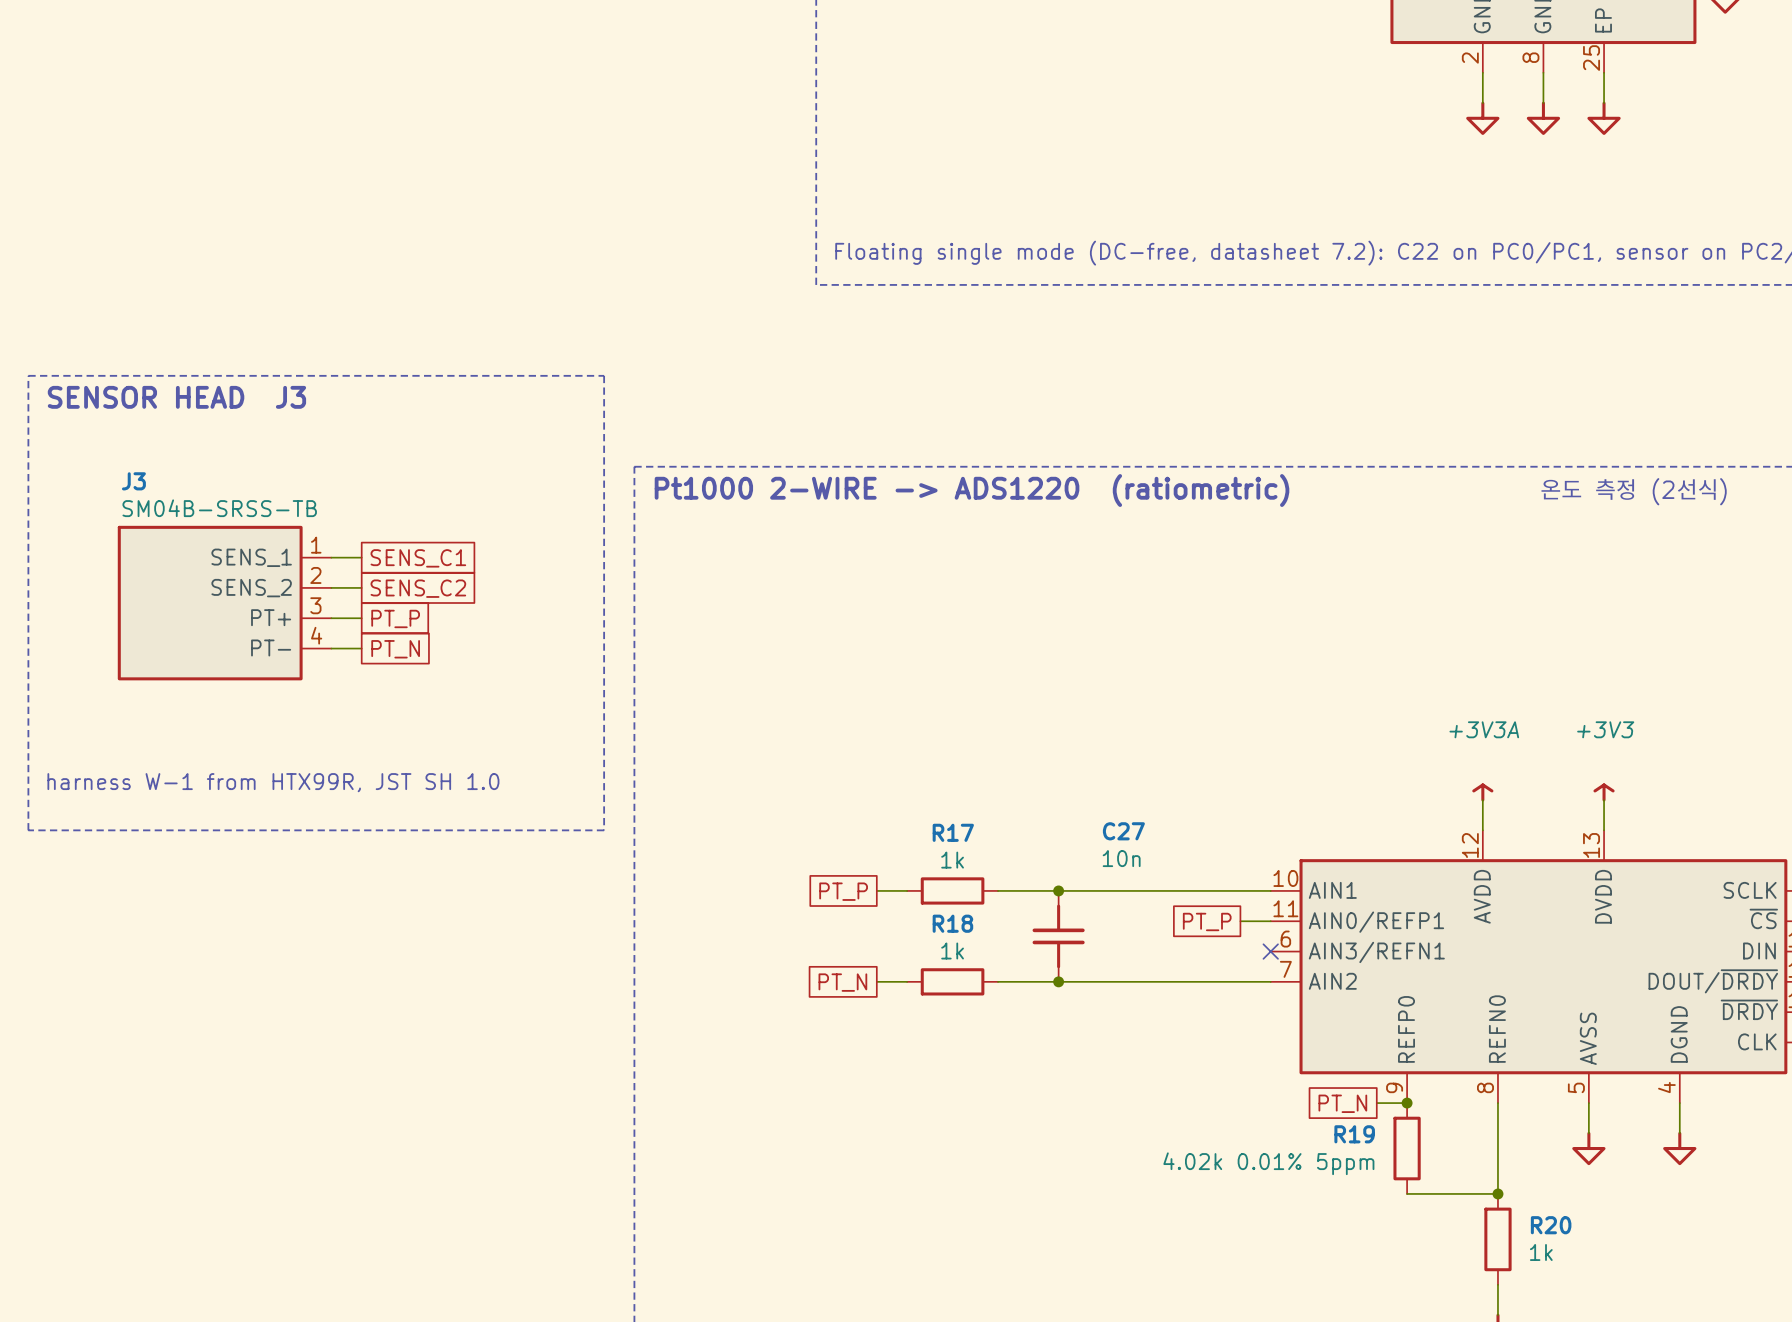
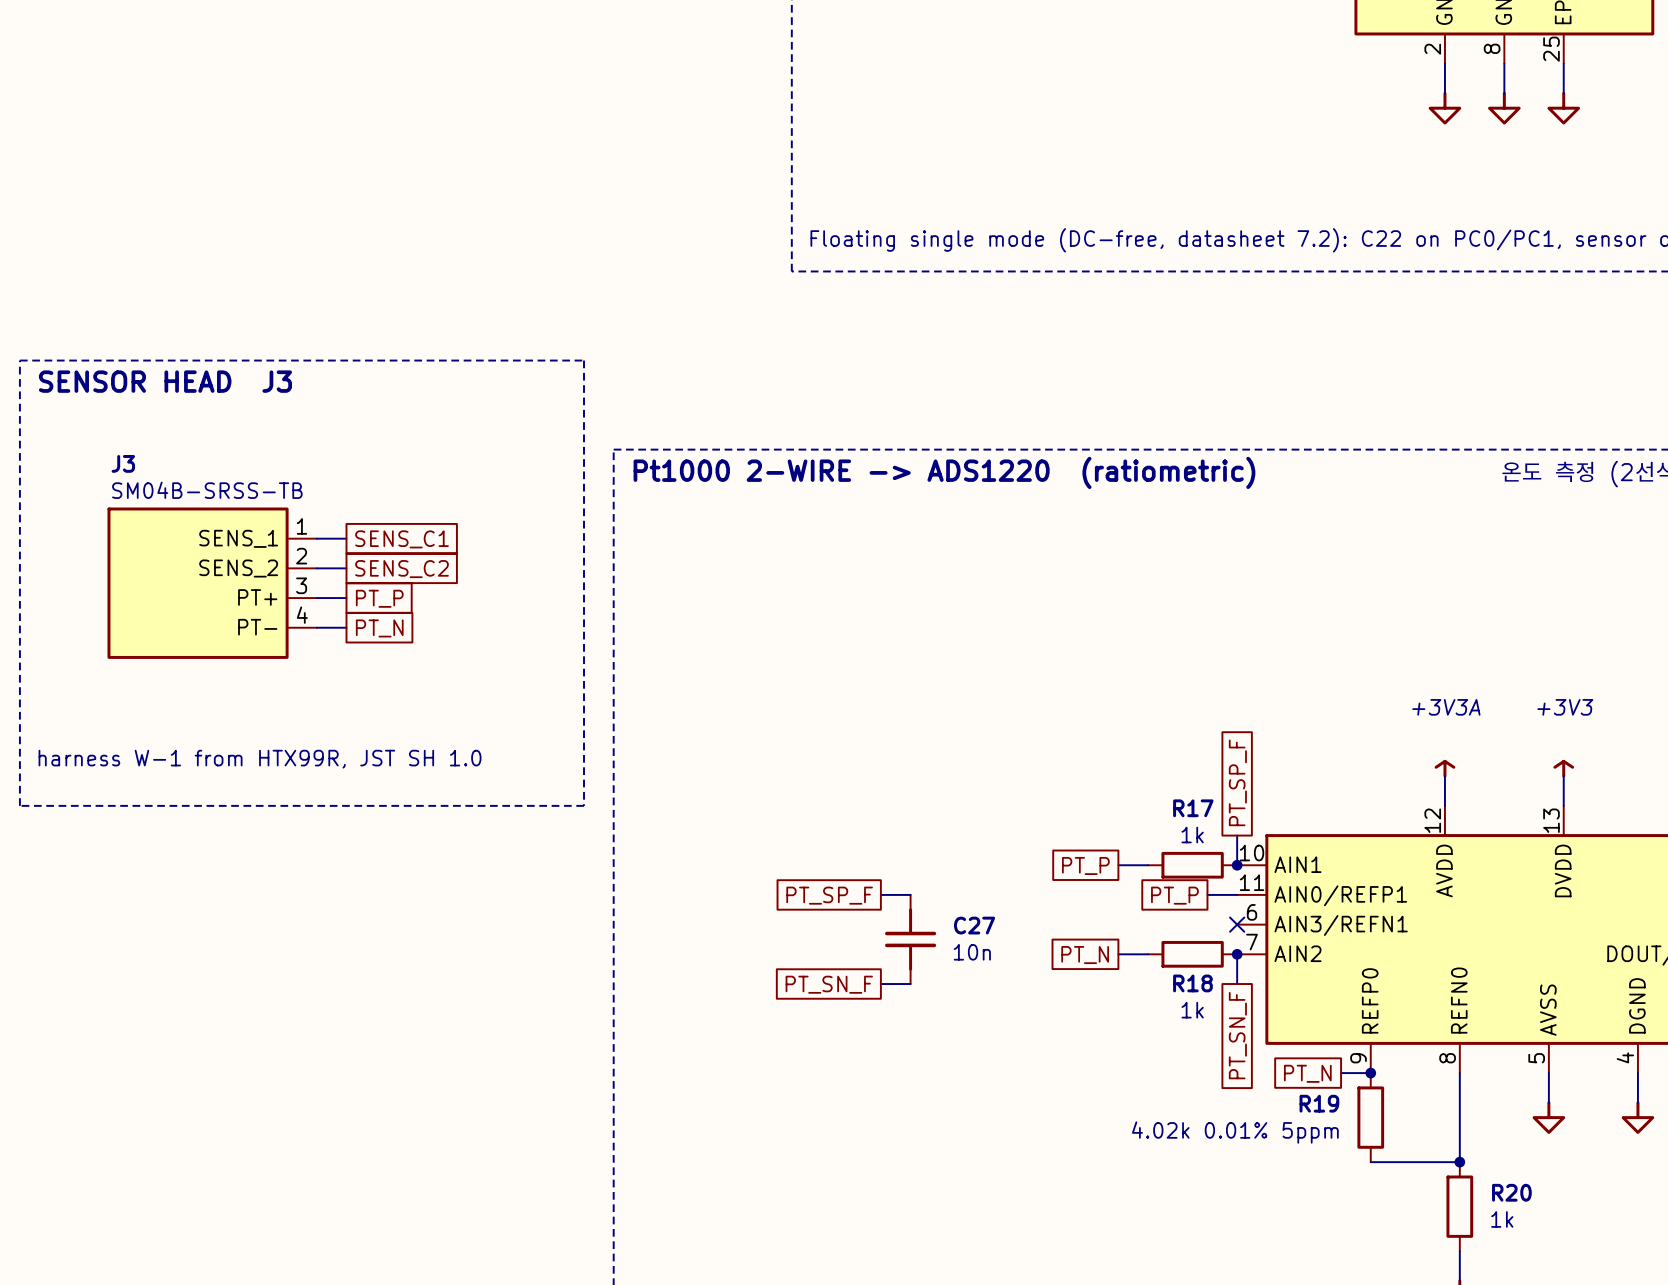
global label: none -> PT_SP_F (1237, 782)
C27 name position: C27 (1123, 831) -> C27 (974, 925)
C27 value position: 10n (1121, 858) -> 10n (972, 952)
wire: (876, 890) (907, 890) -> (880, 894) (910, 894)
R17 position: (952, 890) -> (1192, 865)
wire: (998, 890) (1149, 890) -> none
junction: (1058, 890) -> none
wire: (1179, 890) (1270, 890) -> (1237, 835) (1237, 865)
junction: none -> (1237, 865)
global label position: PT_P (843, 891) -> PT_P (1085, 865)
global label: none -> PT_SP_F (829, 895)
R18 name position: R18 (952, 923) -> R18 (1192, 983)
C27 position: (1058, 936) -> (910, 939)
R18 value position: 1k (952, 950) -> 1k (1192, 1010)
wire: (876, 981) (907, 981) -> (880, 984) (910, 984)
R18 position: (952, 981) -> (1192, 954)
wire: (998, 981) (1149, 981) -> none
junction: (1058, 981) -> none
wire: (1179, 981) (1270, 981) -> (1237, 984) (1237, 954)
junction: none -> (1237, 954)
global label position: PT_N (842, 982) -> PT_N (1085, 955)
global label: none -> PT_SN_F (829, 984)
global label: none -> PT_SN_F (1237, 1035)

